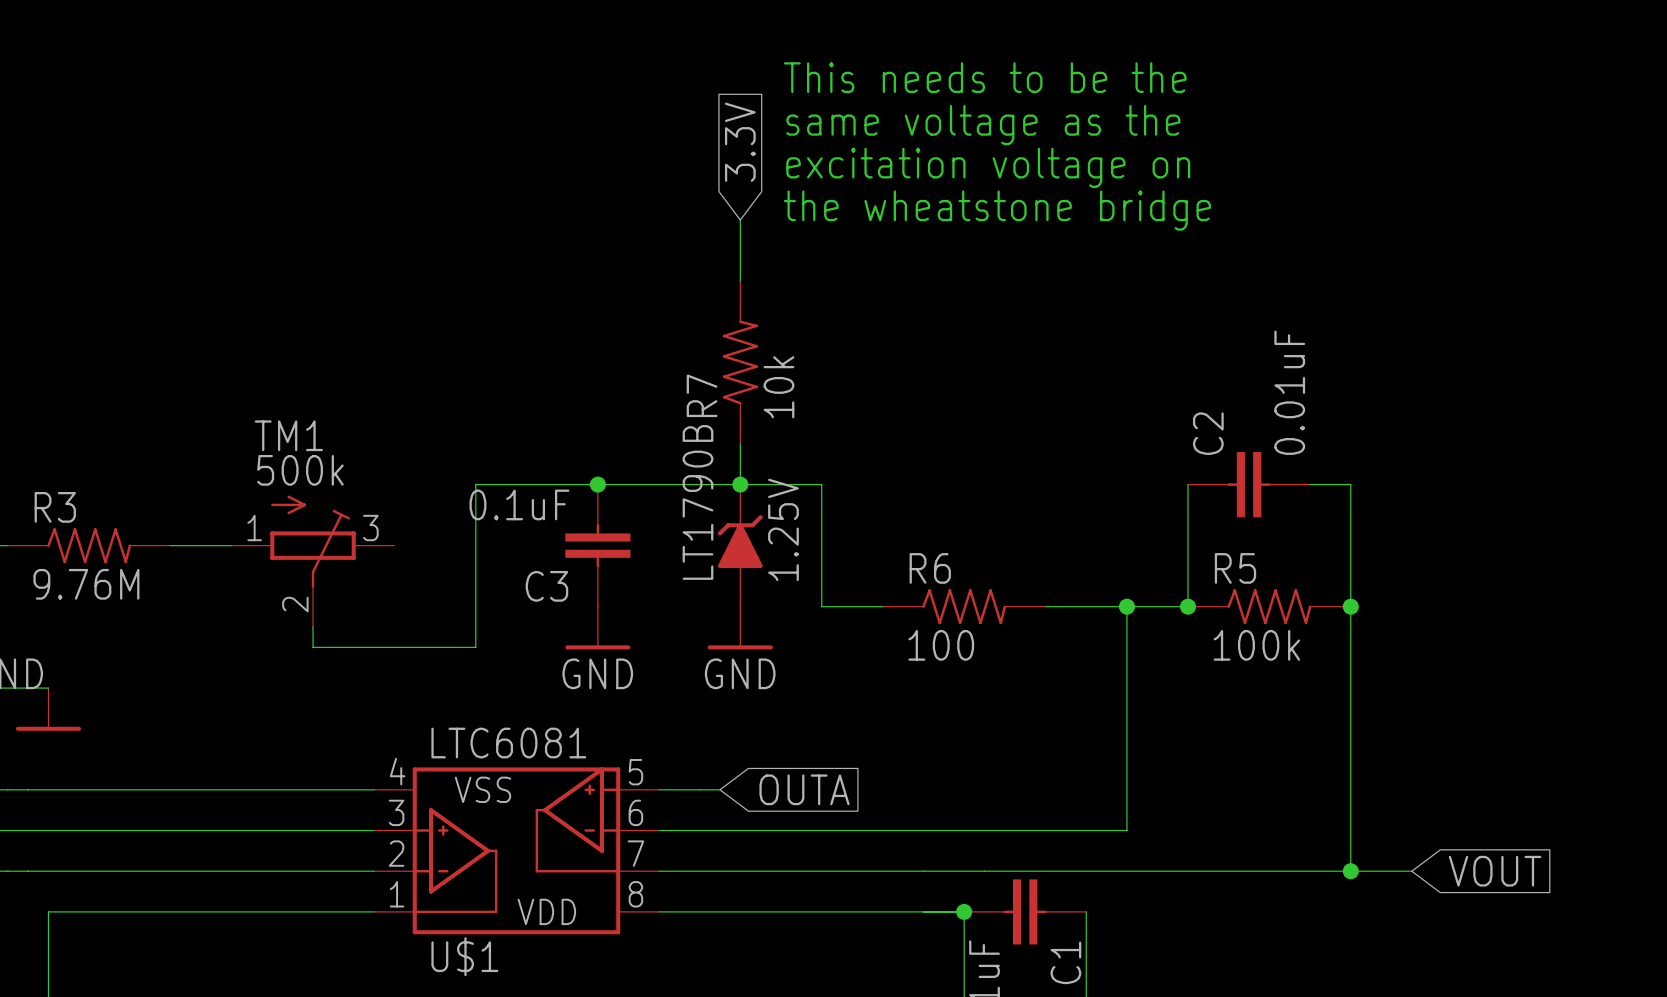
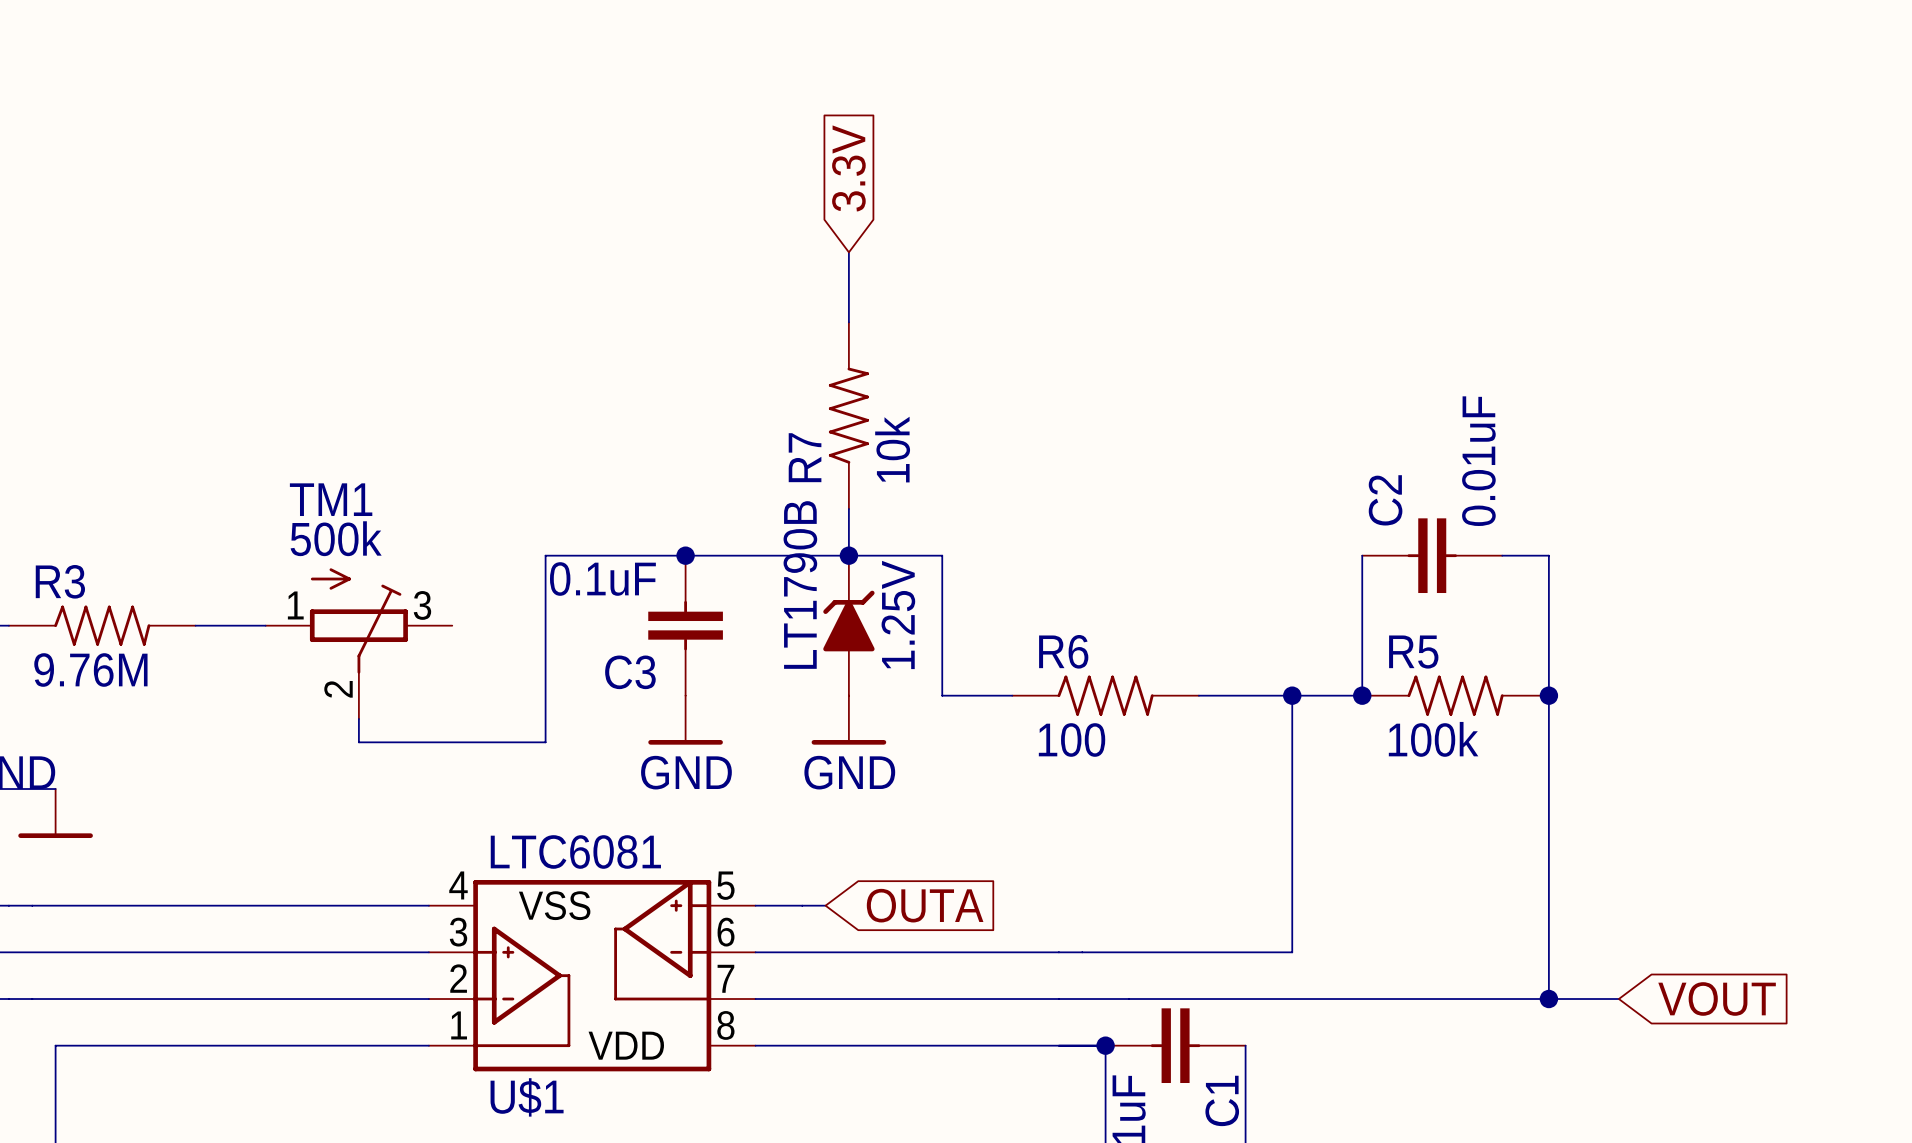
text: This needs to be the (985, 77) -> none
text: same voltage as the (983, 125) -> none
text: excitation voltage on (988, 167) -> none
text: the wheatstone bridge (997, 210) -> none

